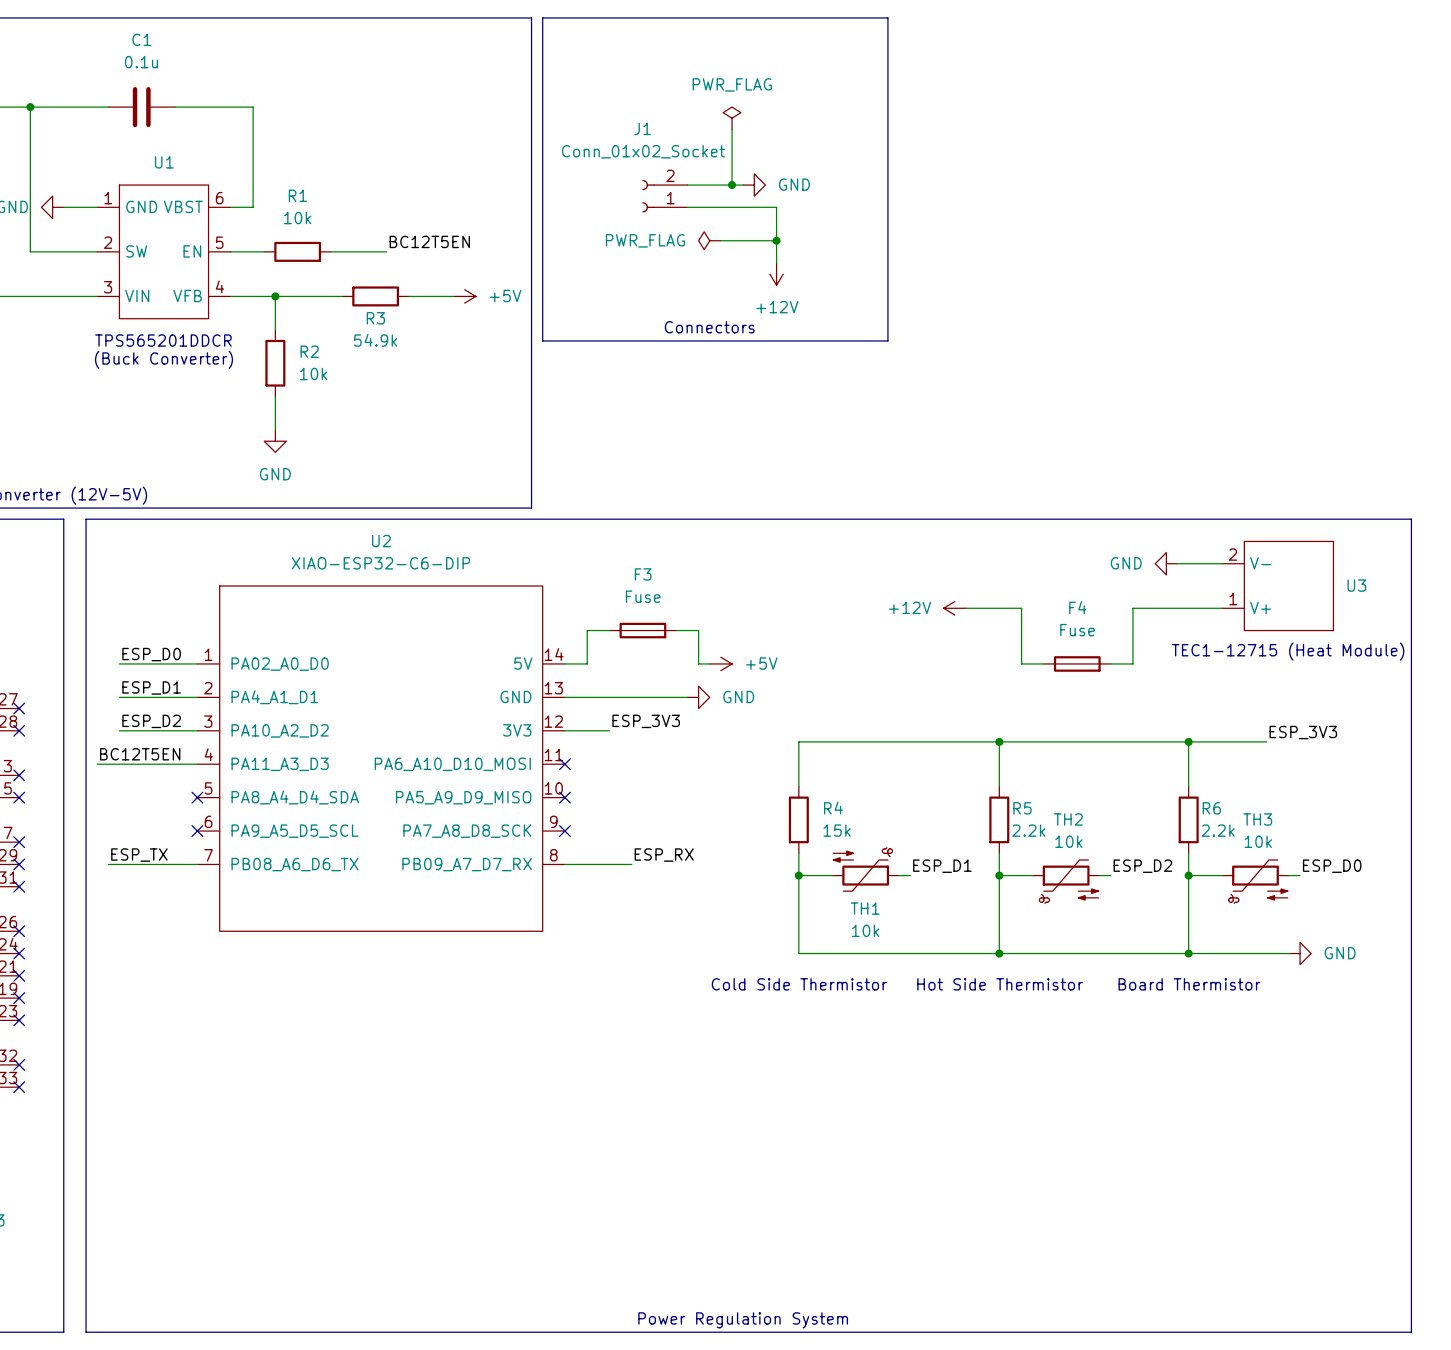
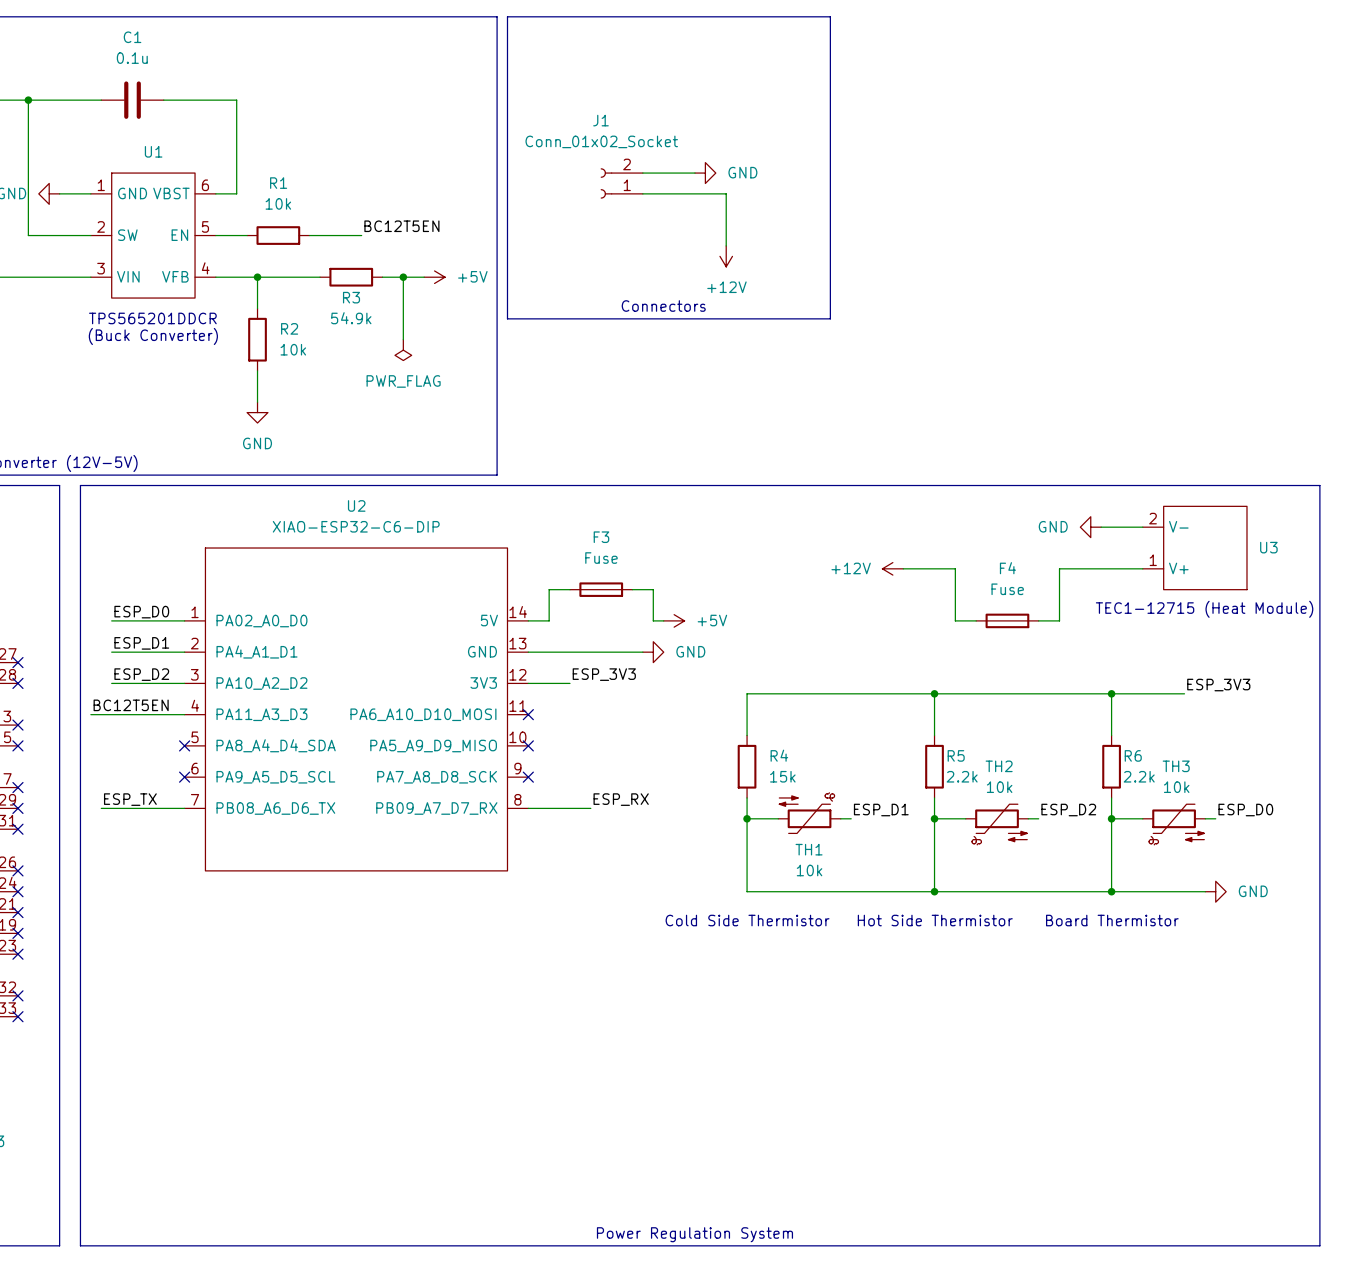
power symbol: PWR_FLAG (732, 118) -> none
wire: (732, 129) (732, 185) -> none
junction: (732, 185) -> none
power symbol: PWR_FLAG (709, 240) -> none
wire: (720, 240) (776, 240) -> none
junction: (776, 240) -> none
wire: none -> (403, 277) (403, 339)
junction: none -> (403, 277)
power symbol: none -> PWR_FLAG (403, 350)

